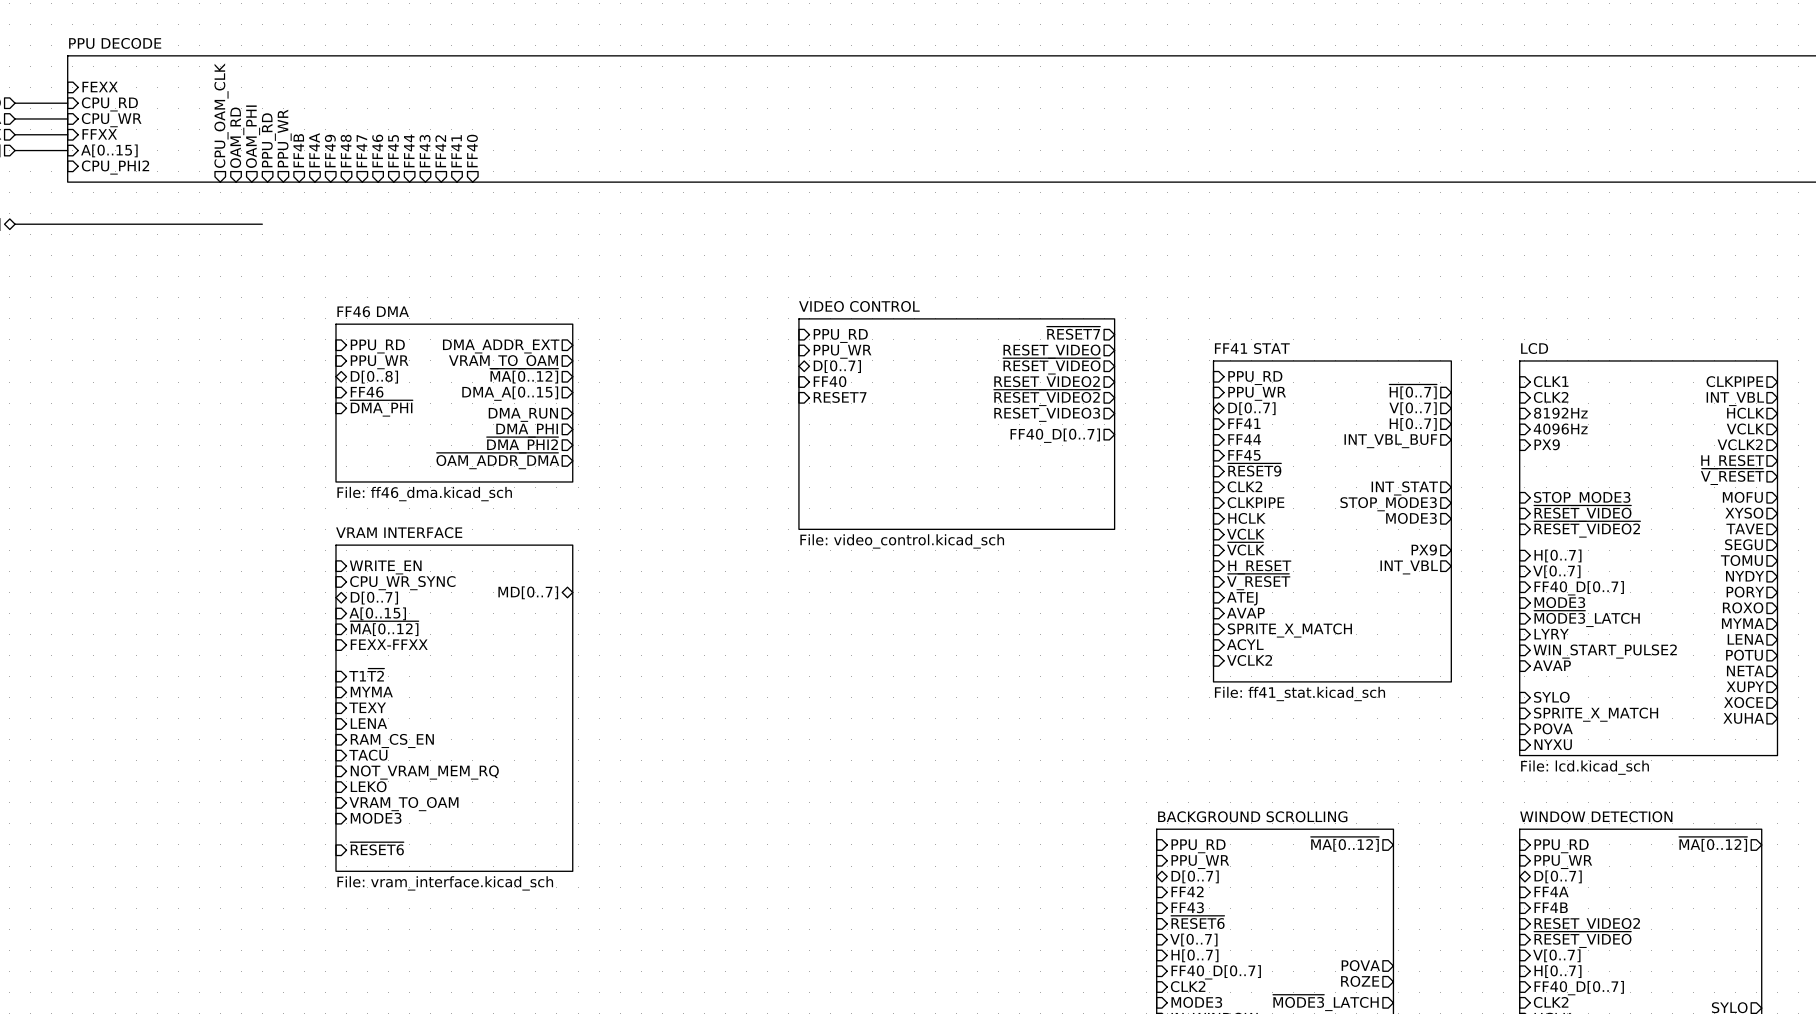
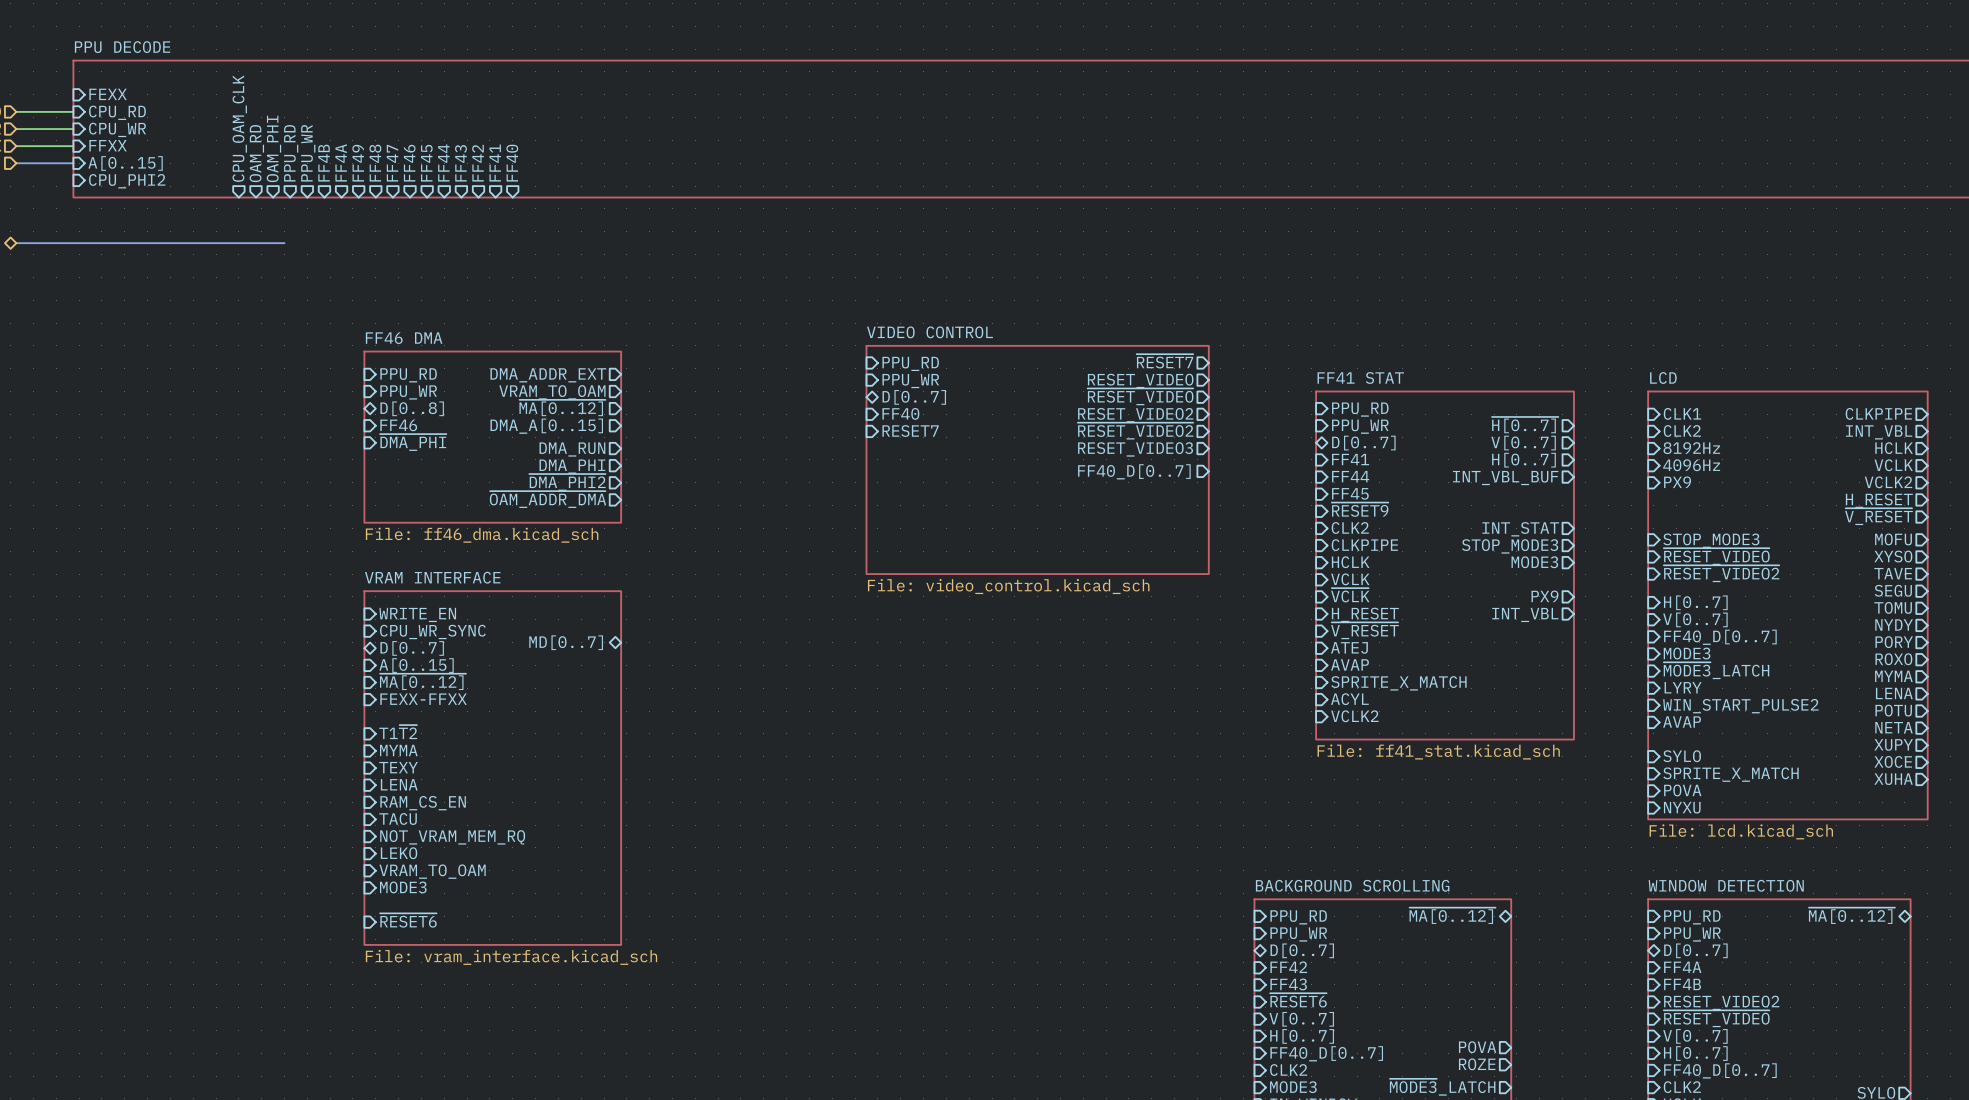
sheet pin shape: output (1344, 844) -> bidirectional (1452, 915)
sheet pin shape: output (1713, 844) -> bidirectional (1851, 915)

